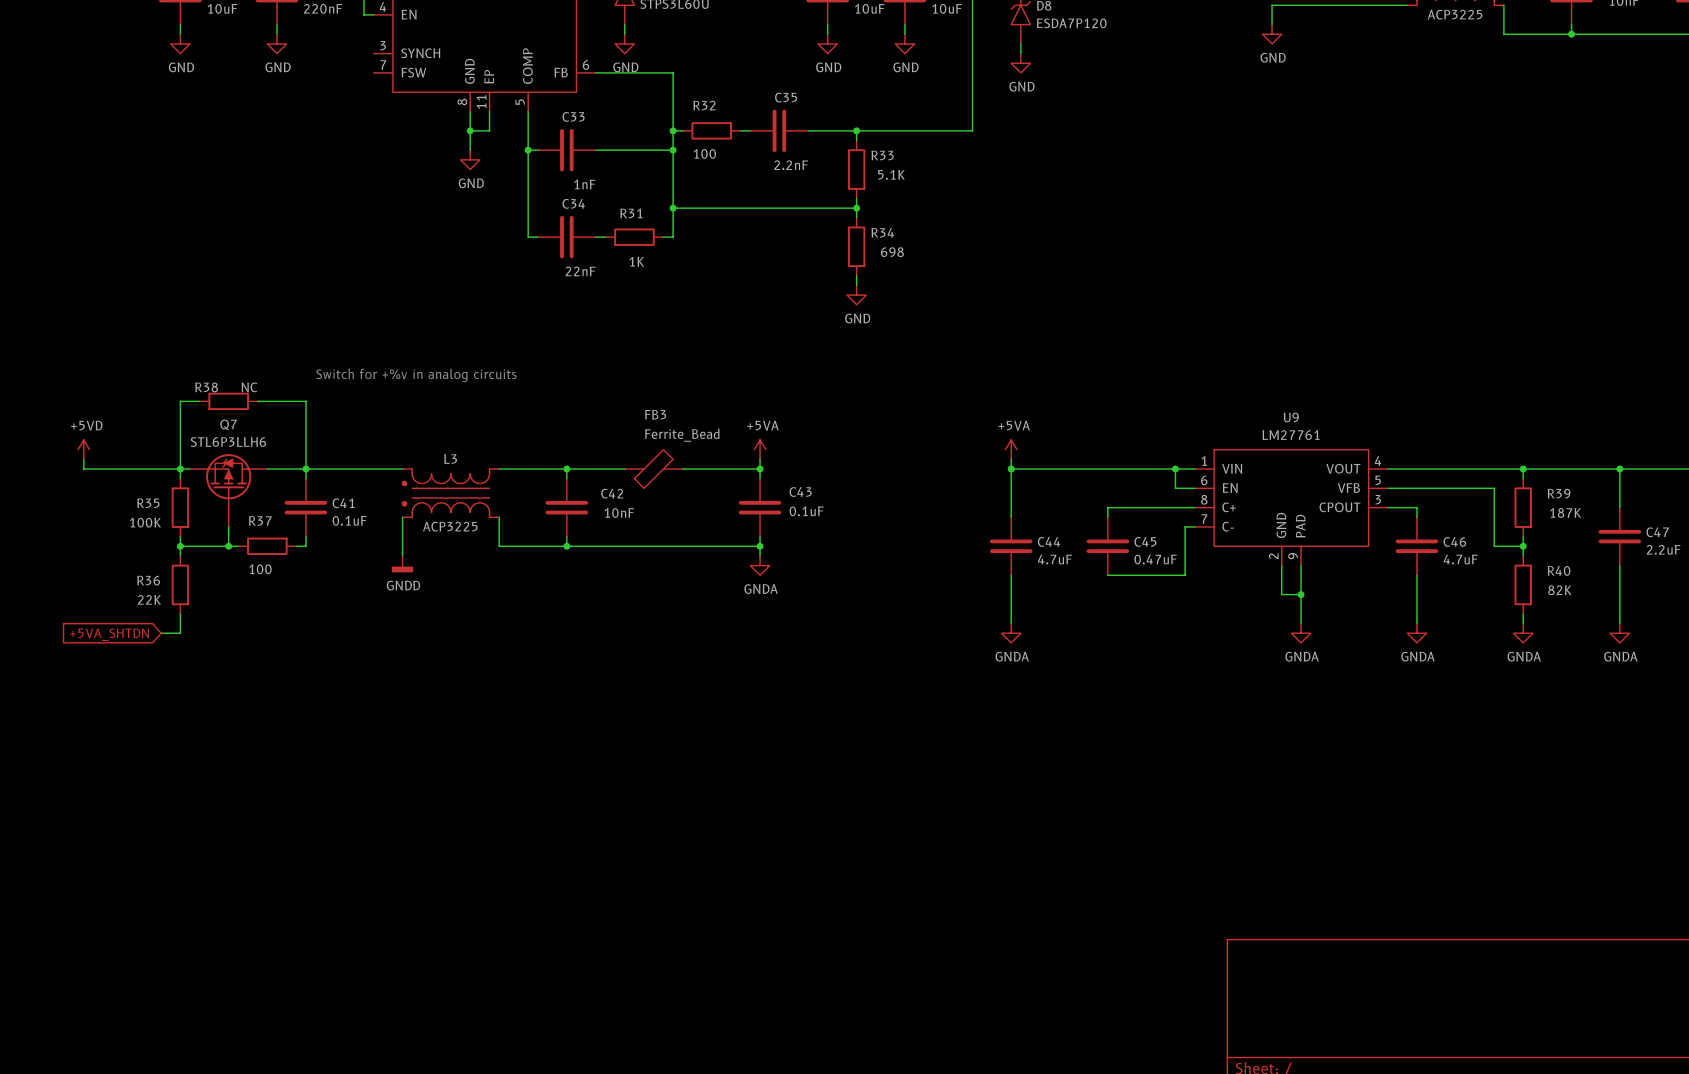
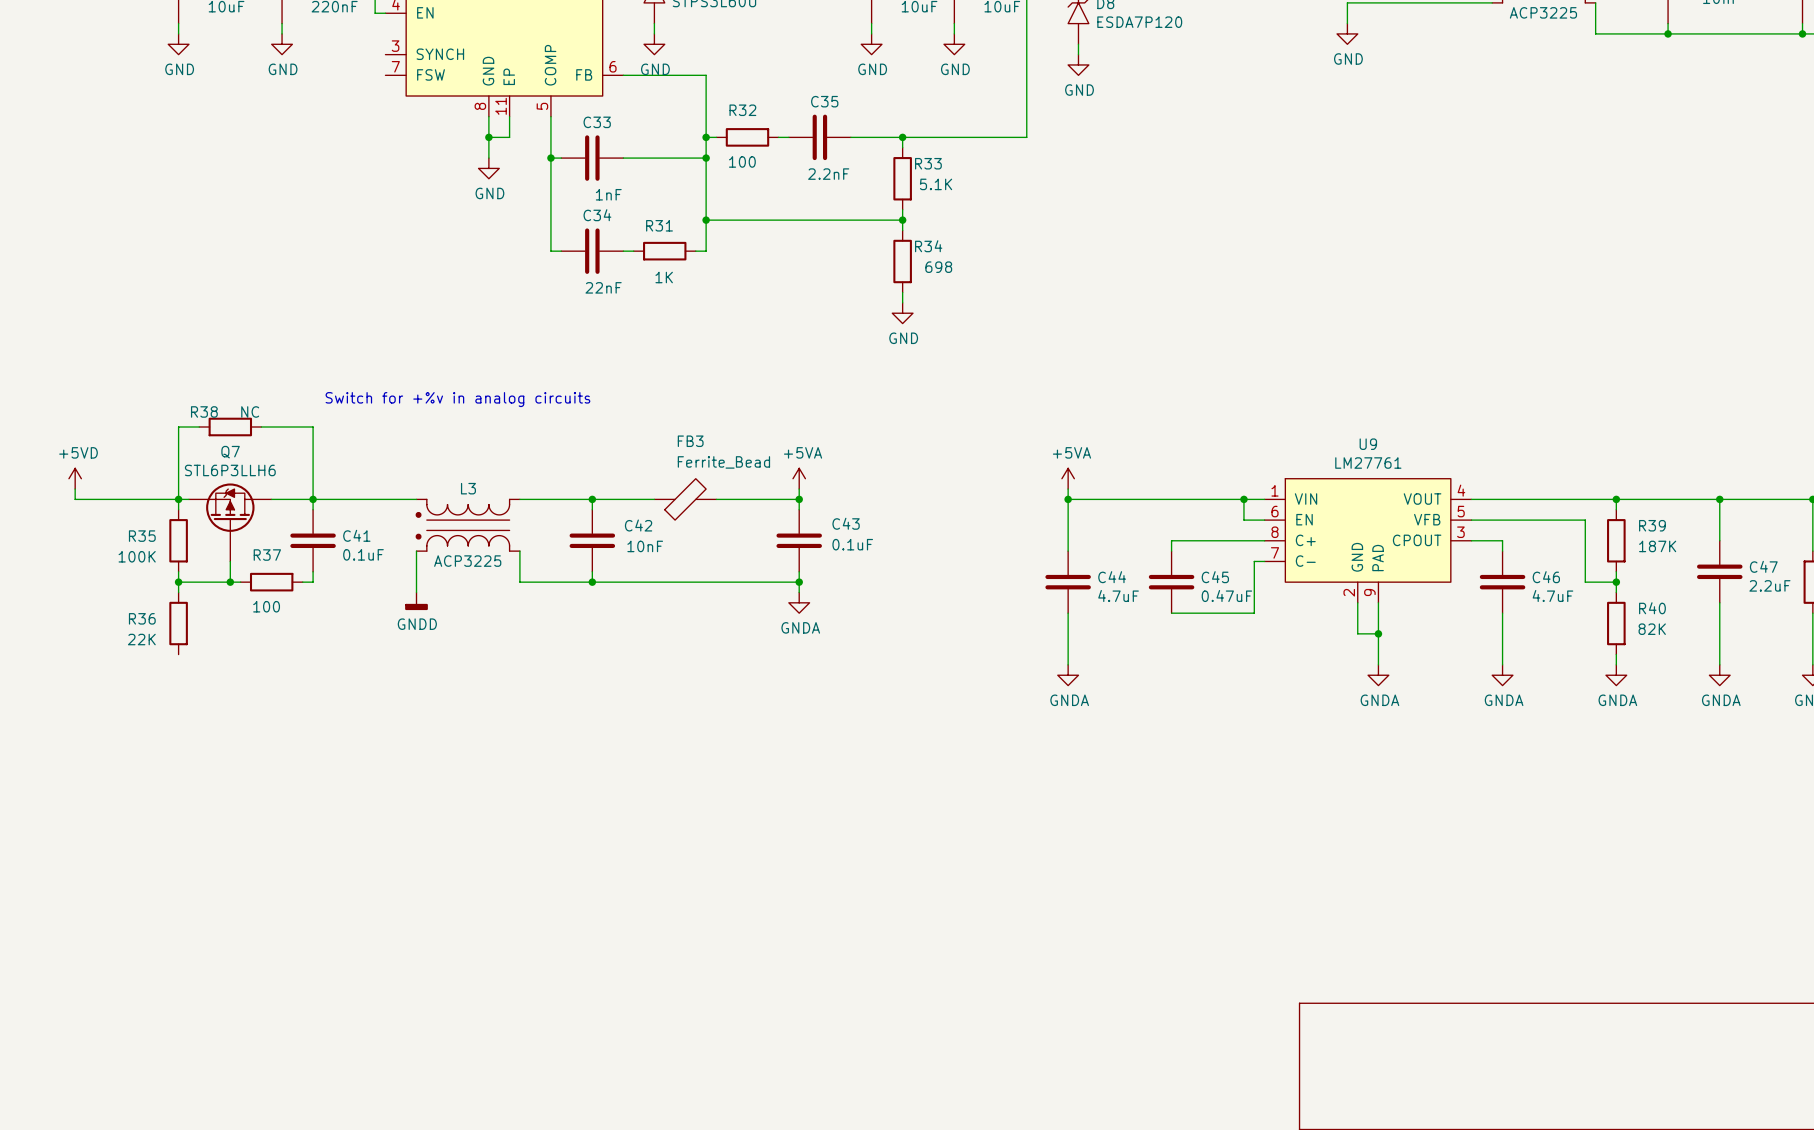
wire: (180, 613) (180, 633) (161, 633) -> none
global label: +5VA_SHTDN (109, 634) -> none

